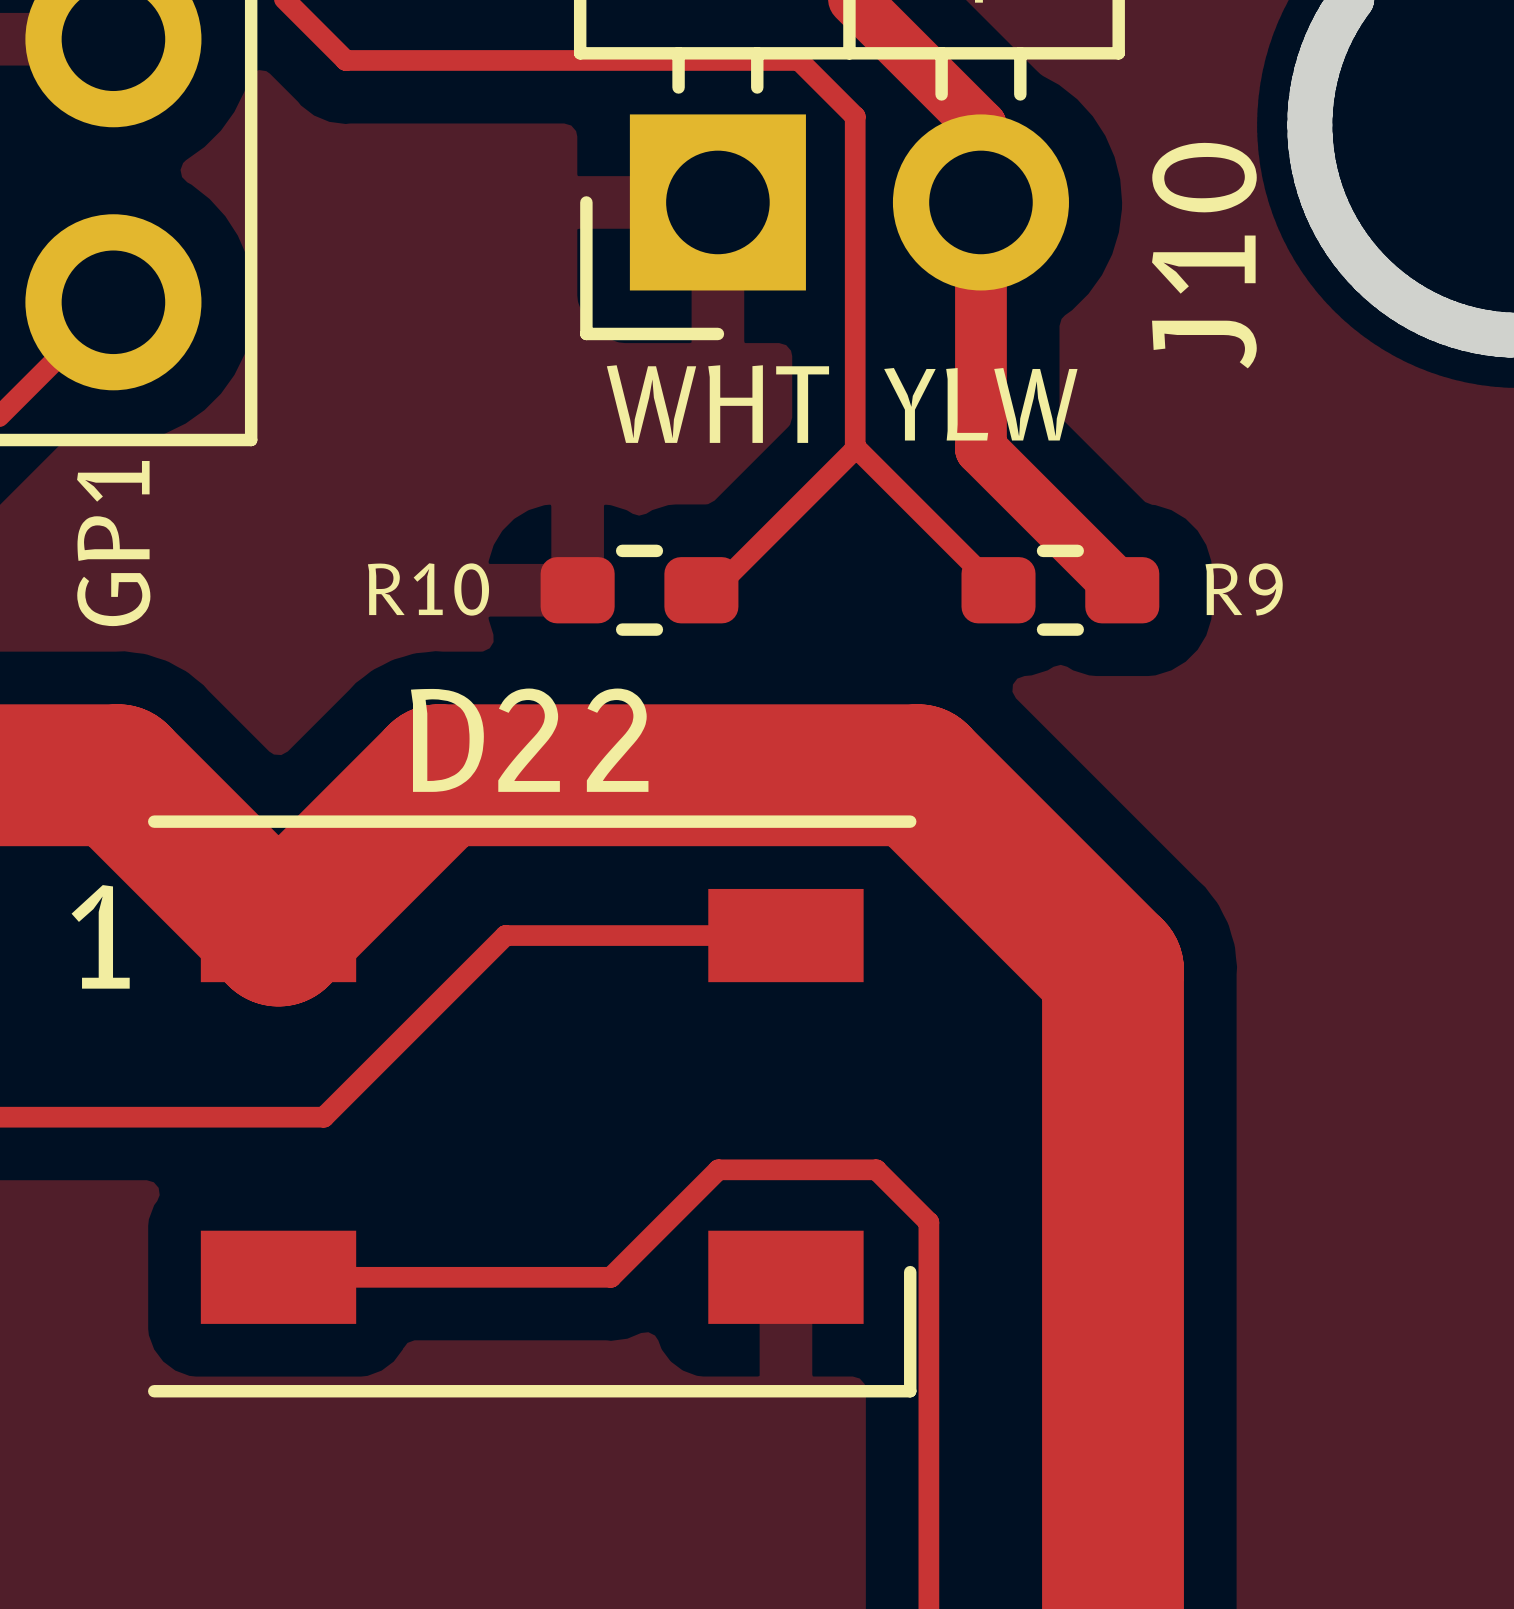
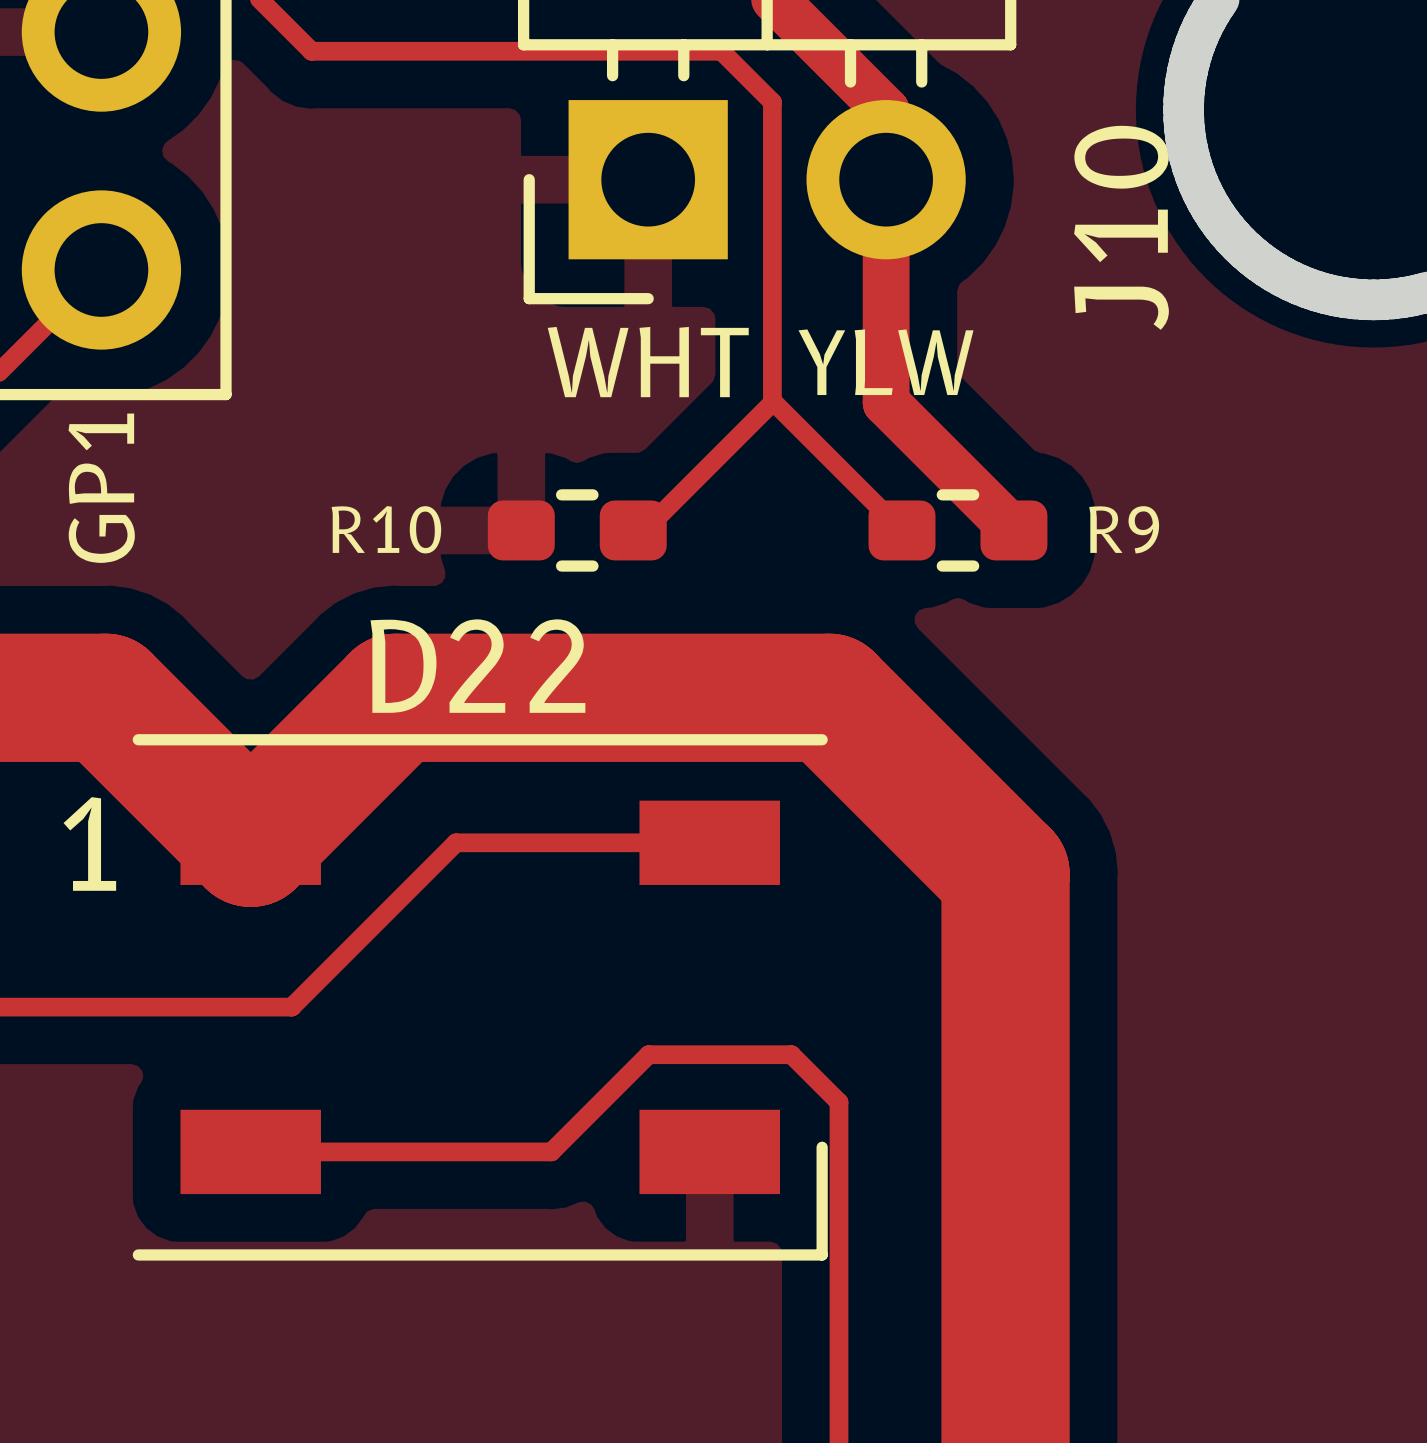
J10 name position: J10 (1204, 255) -> J10 (1121, 227)

